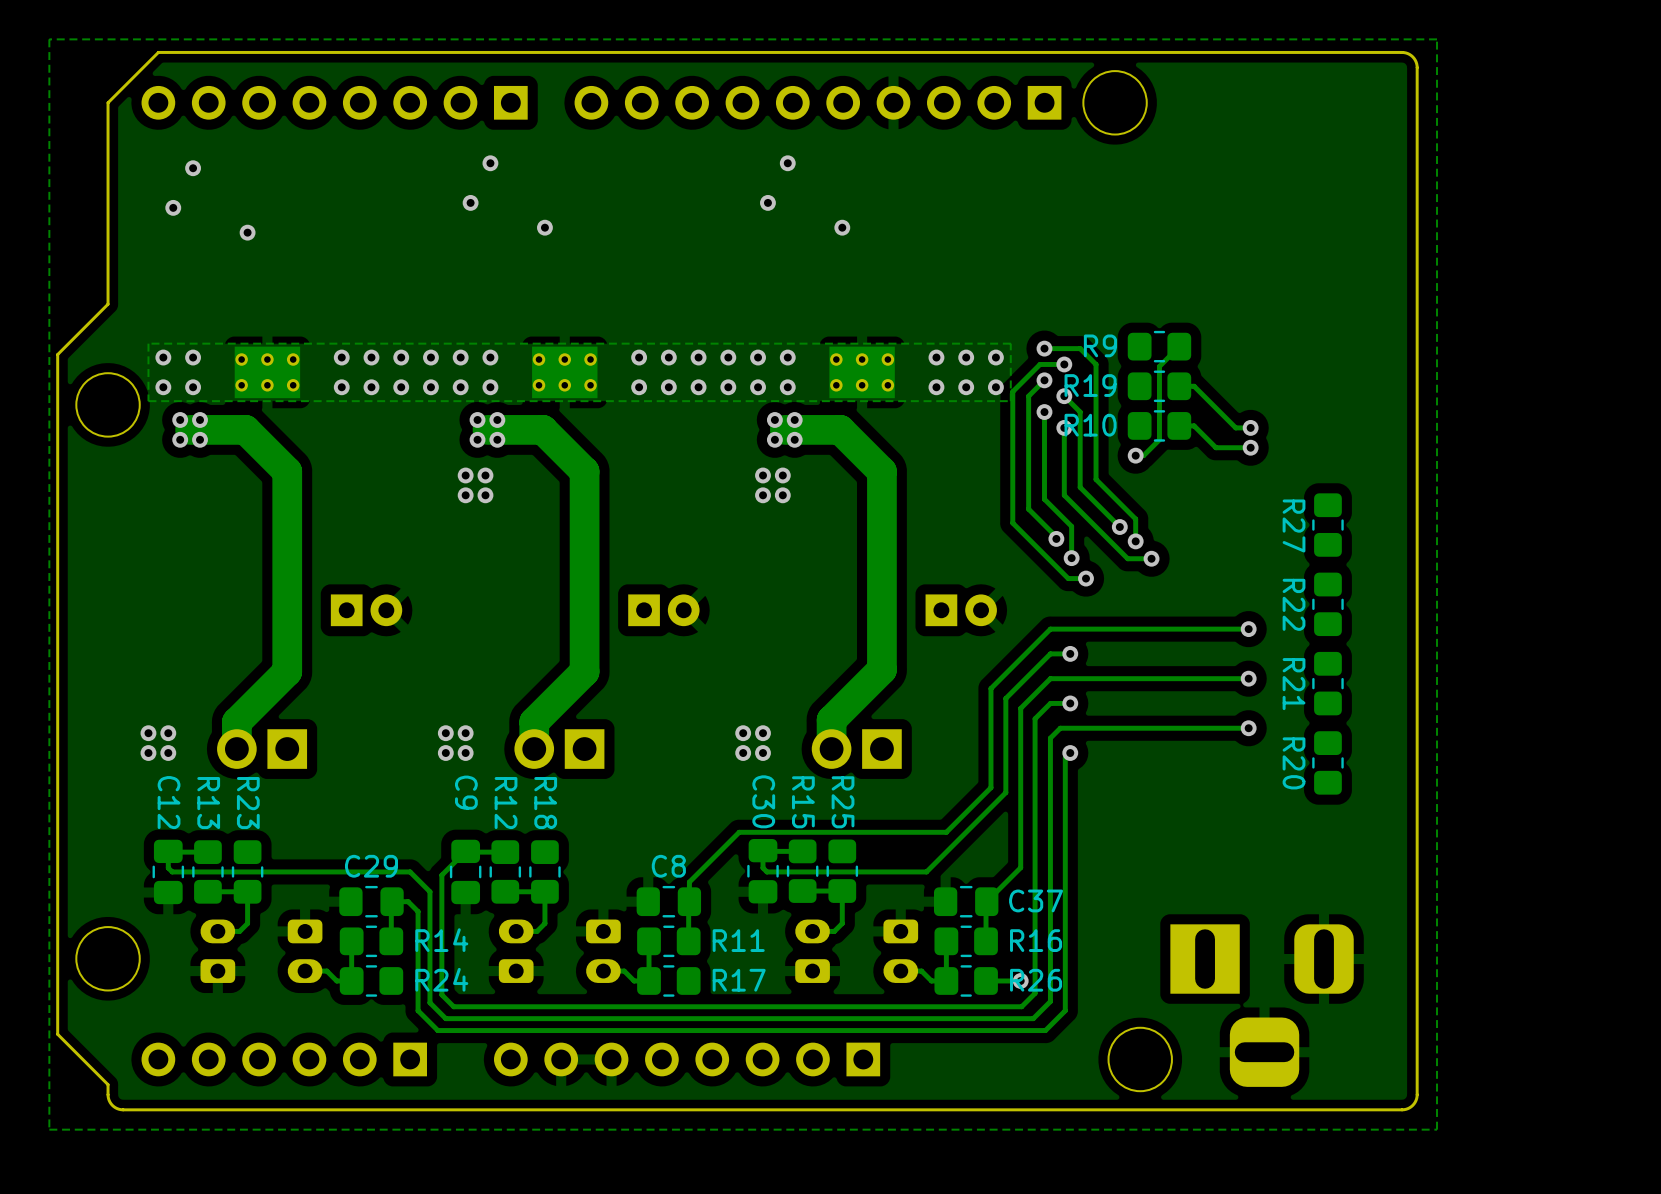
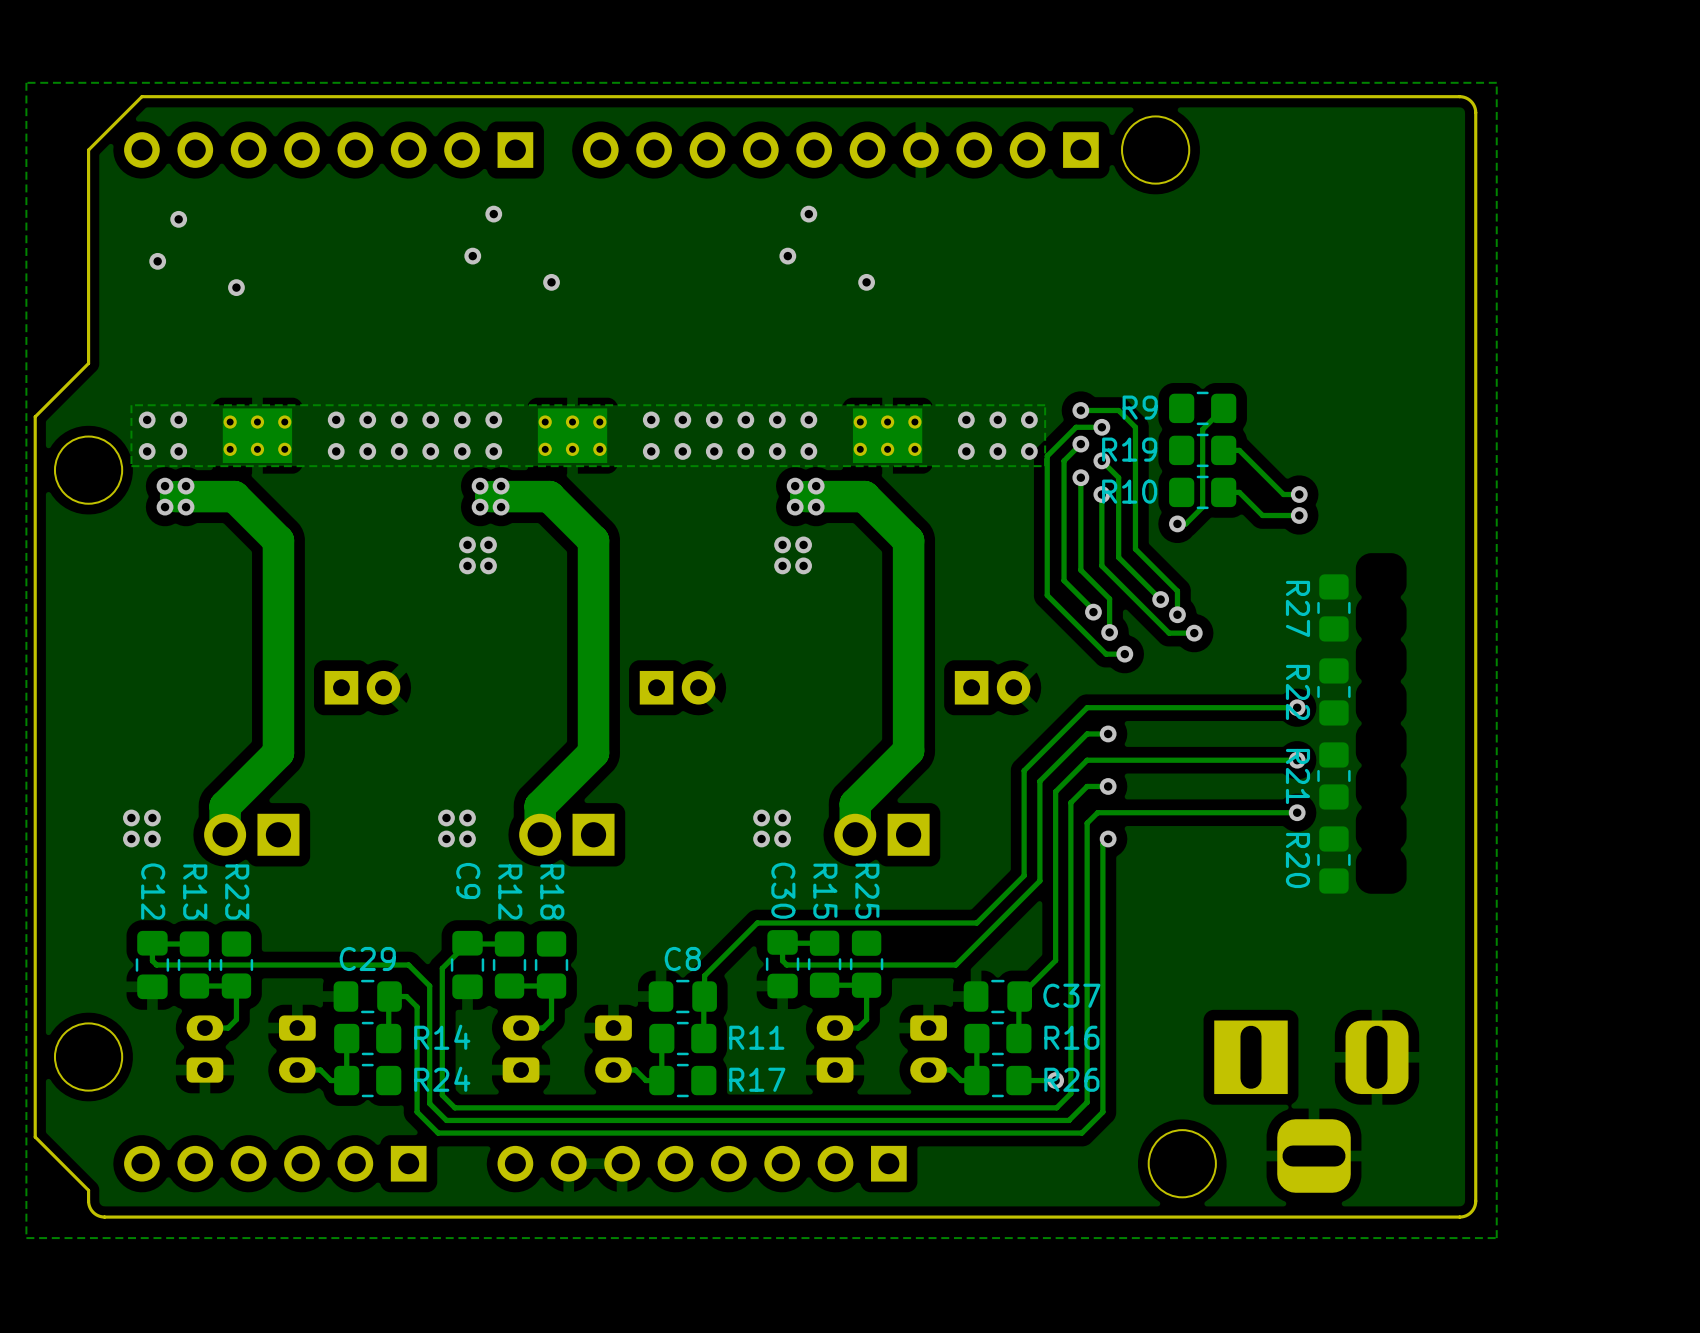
R27 position: (1327, 525) -> (1333, 607)
R22 position: (1327, 604) -> (1333, 691)
R21 position: (1327, 683) -> (1333, 775)
R20 position: (1327, 762) -> (1333, 859)

